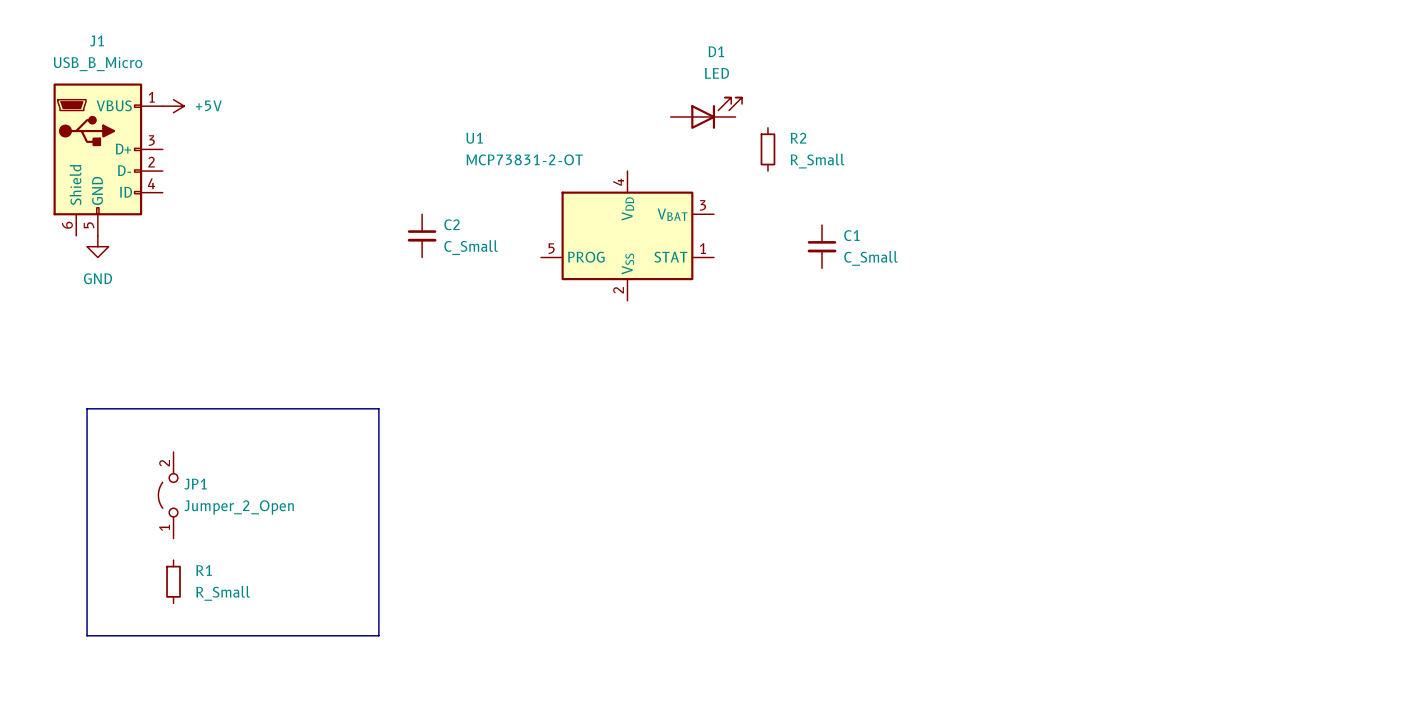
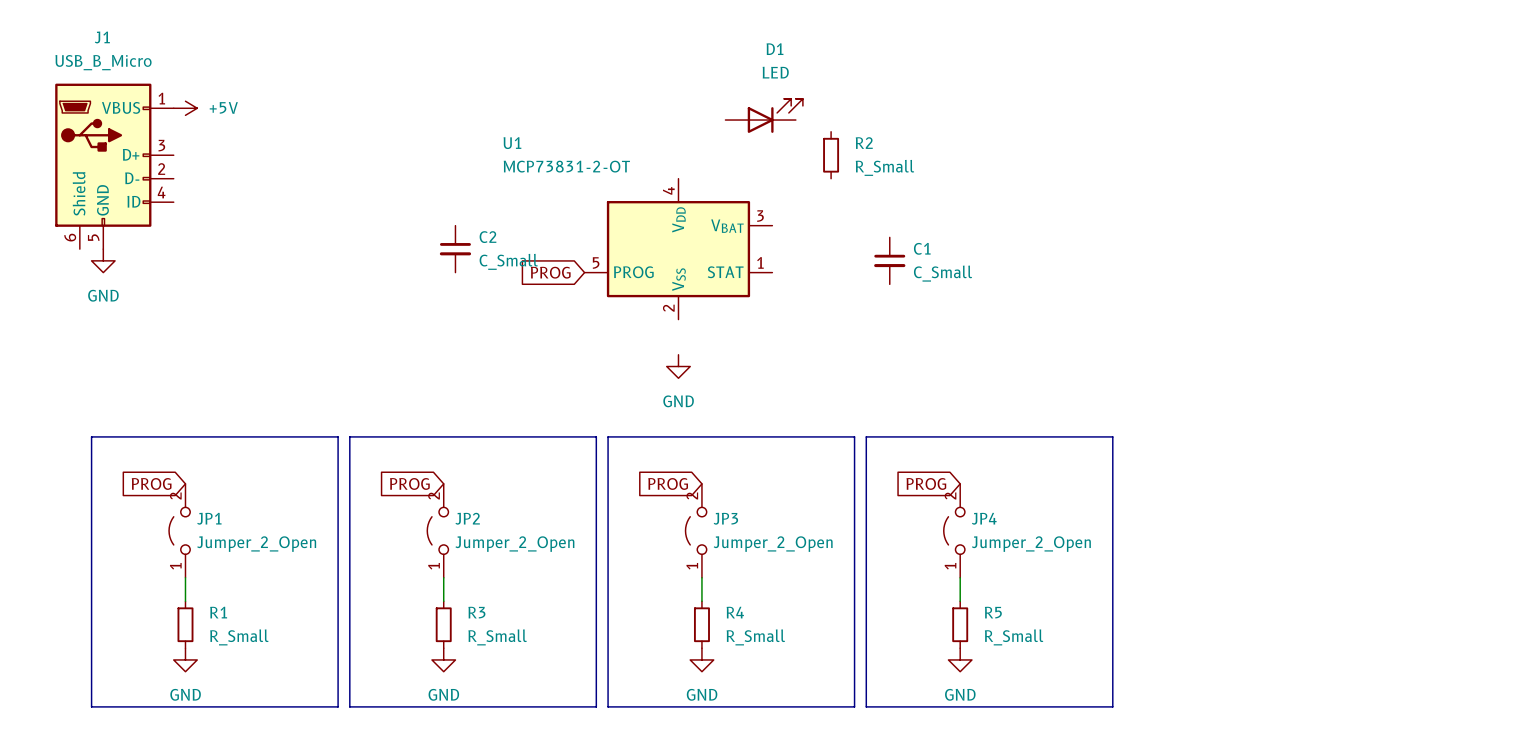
global label: none -> PROG (550, 272)
power symbol: none -> GND (678, 366)
line: (314, 408) (324, 408) -> (408, 436) (596, 436) (596, 706) (349, 706) (349, 436)
line: (378, 408) (378, 635) (87, 635) -> (338, 436) (338, 706) (91, 706) (91, 683)
line: none -> (608, 436) (854, 436) (854, 706) (608, 706) (608, 436)
line: none -> (866, 436) (1112, 436) (1112, 706) (866, 706) (866, 436)
global label: none -> PROG (151, 483)
global label: none -> PROG (409, 483)
global label: none -> PROG (668, 483)
global label: none -> PROG (926, 483)
JP2: none -> Jumper_2_Open (437, 530)
JP3: none -> Jumper_2_Open (696, 530)
JP4: none -> Jumper_2_Open (954, 530)
wire: none -> (185, 577) (185, 601)
wire: none -> (443, 577) (443, 601)
wire: none -> (701, 577) (701, 601)
wire: none -> (960, 577) (960, 601)
R3: none -> R_Small (443, 624)
R4: none -> R_Small (701, 624)
R5: none -> R_Small (960, 624)
power symbol: none -> GND (185, 659)
power symbol: none -> GND (443, 659)
power symbol: none -> GND (701, 659)
power symbol: none -> GND (960, 659)

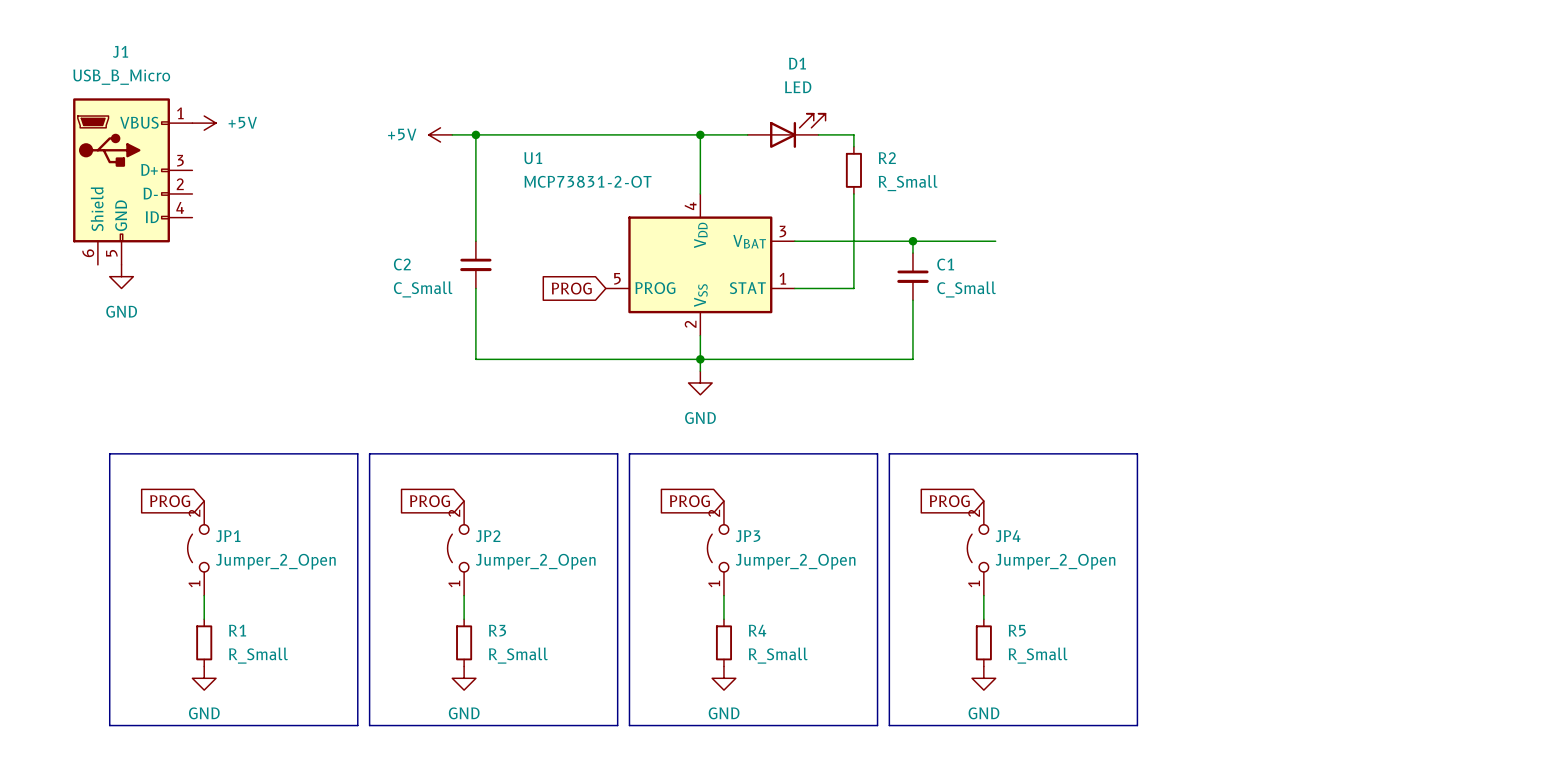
power symbol: none -> +5V (440, 134)
wire: none -> (452, 134) (747, 134)
wire: none -> (475, 134) (475, 241)
junction: none -> (475, 134)
wire: none -> (700, 134) (700, 193)
junction: none -> (700, 134)
wire: none -> (818, 134) (853, 134) (853, 146)
wire: none -> (853, 193) (853, 288) (794, 288)
wire: none -> (794, 241) (995, 241)
wire: none -> (912, 241) (912, 253)
junction: none -> (912, 241)
C2 name position: C2 (487, 237) -> C2 (402, 264)
C2 value position: C_Small (508, 261) -> C_Small (423, 289)
wire: none -> (475, 288) (475, 359) (912, 359) (912, 300)
wire: none -> (700, 335) (700, 371)
junction: none -> (700, 359)

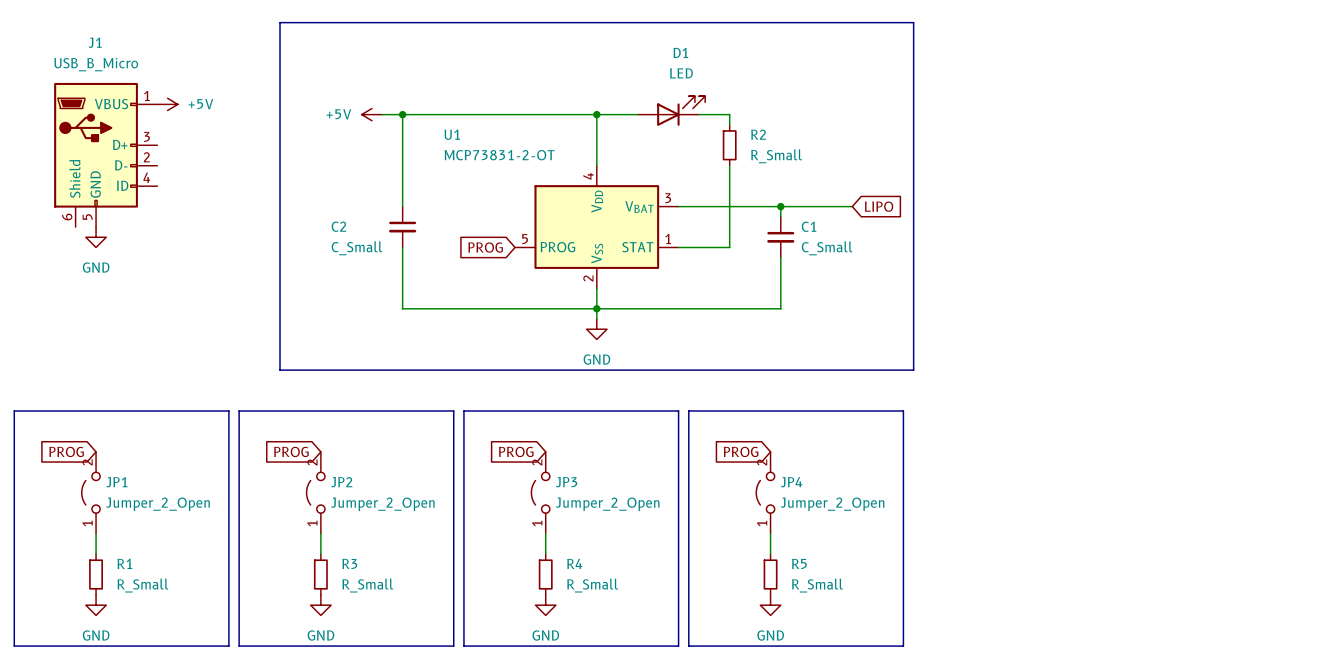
line: none -> (280, 22) (280, 370) (913, 370) (913, 22) (280, 22)
global label: none -> LIPO (879, 206)
line: (109, 453) (357, 453) (357, 725) (109, 725) (109, 453) -> (14, 411) (228, 411) (228, 646) (14, 646) (14, 411)
line: (369, 453) (617, 453) (617, 725) (369, 725) (369, 453) -> (239, 411) (453, 411) (453, 646) (239, 646) (239, 411)
line: (629, 453) (877, 453) (877, 725) (629, 725) (629, 453) -> (463, 411) (678, 411) (678, 646) (463, 646) (463, 411)
line: (889, 453) (1137, 453) (1137, 725) (889, 725) (889, 453) -> (688, 411) (903, 411) (903, 646) (688, 646) (688, 411)
global label position: PROG (170, 501) -> PROG (66, 451)
global label position: PROG (430, 501) -> PROG (291, 451)
global label position: PROG (689, 501) -> PROG (516, 451)
global label position: PROG (949, 501) -> PROG (741, 451)
JP1 position: (198, 548) -> (90, 492)
JP2 position: (458, 548) -> (315, 492)
JP3 position: (718, 548) -> (540, 492)
JP4 position: (977, 548) -> (765, 492)
wire: (204, 595) (204, 619) -> (96, 533) (96, 554)
wire: (464, 595) (464, 619) -> (320, 533) (320, 554)
wire: (723, 595) (723, 619) -> (545, 533) (545, 554)
wire: (983, 595) (983, 619) -> (770, 533) (770, 554)
R1 position: (204, 642) -> (96, 574)
R3 position: (464, 642) -> (320, 574)
R4 position: (723, 642) -> (545, 574)
R5 position: (983, 642) -> (770, 574)
power symbol position: GND (204, 678) -> GND (96, 605)
power symbol position: GND (464, 678) -> GND (320, 605)
power symbol position: GND (723, 678) -> GND (545, 605)
power symbol position: GND (983, 678) -> GND (770, 605)

